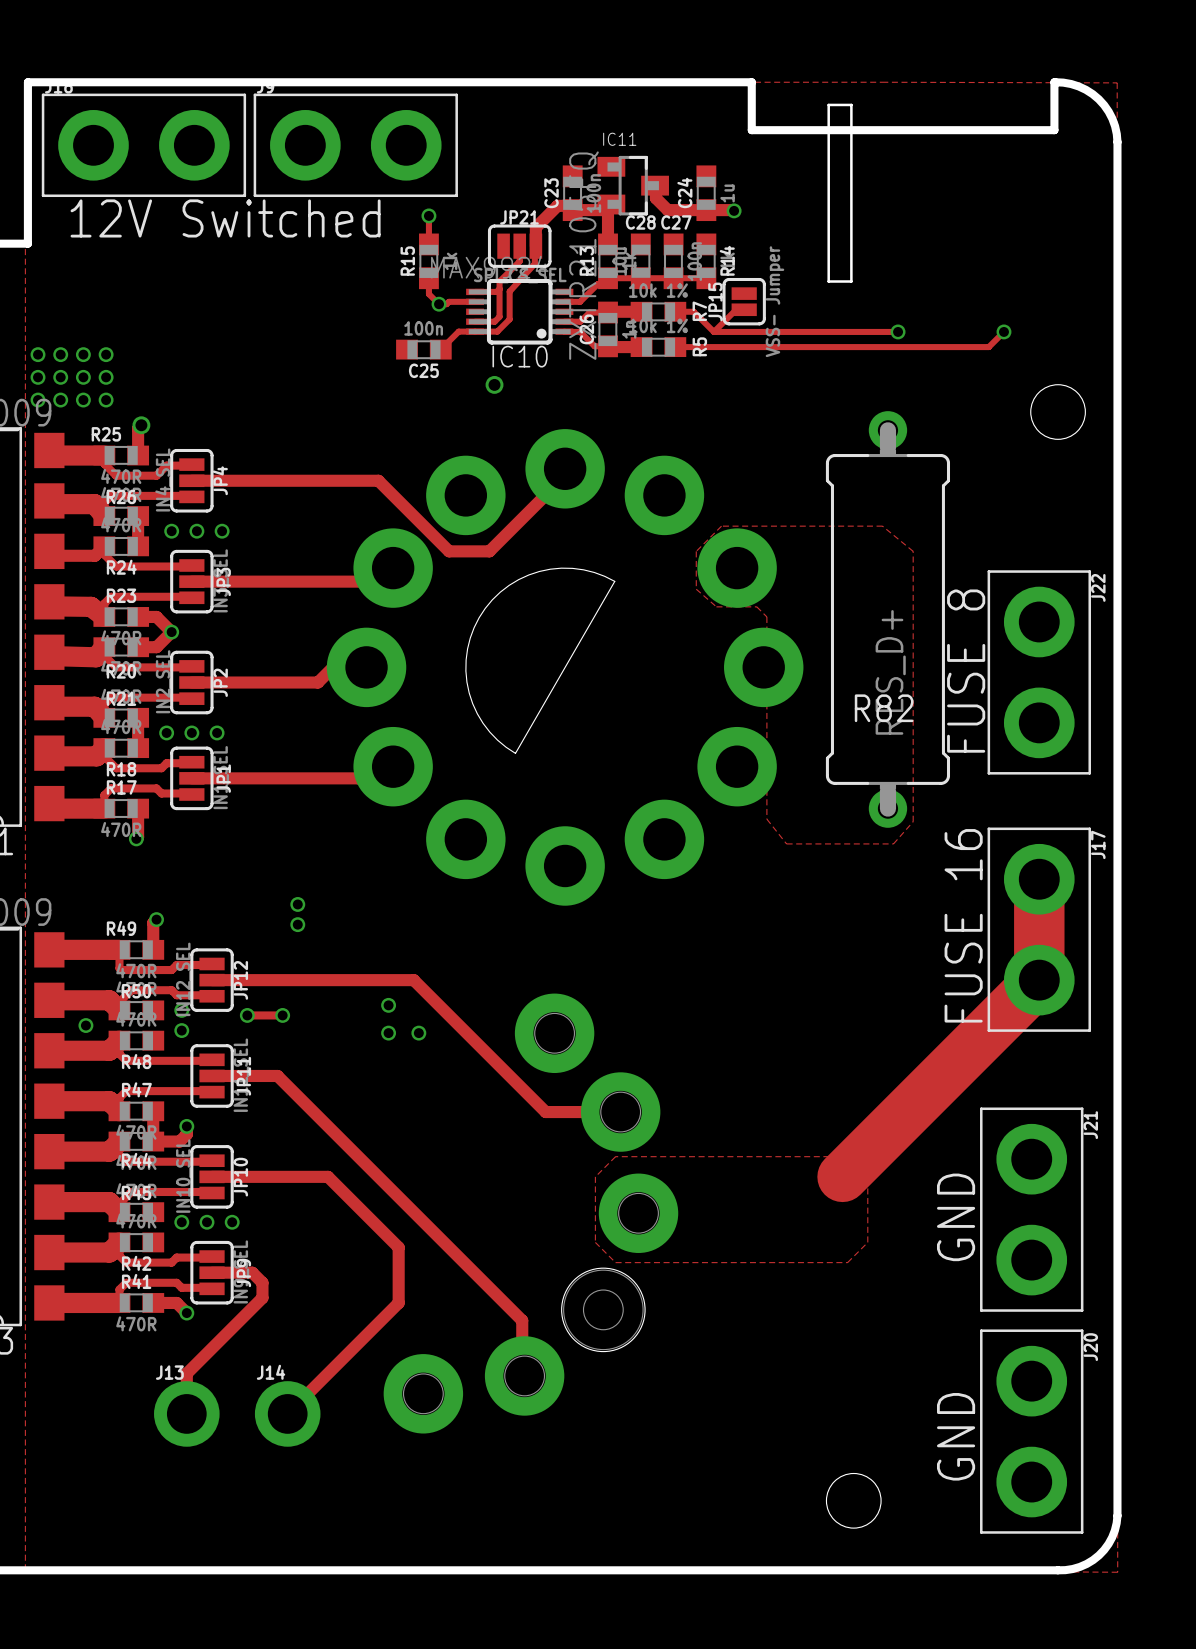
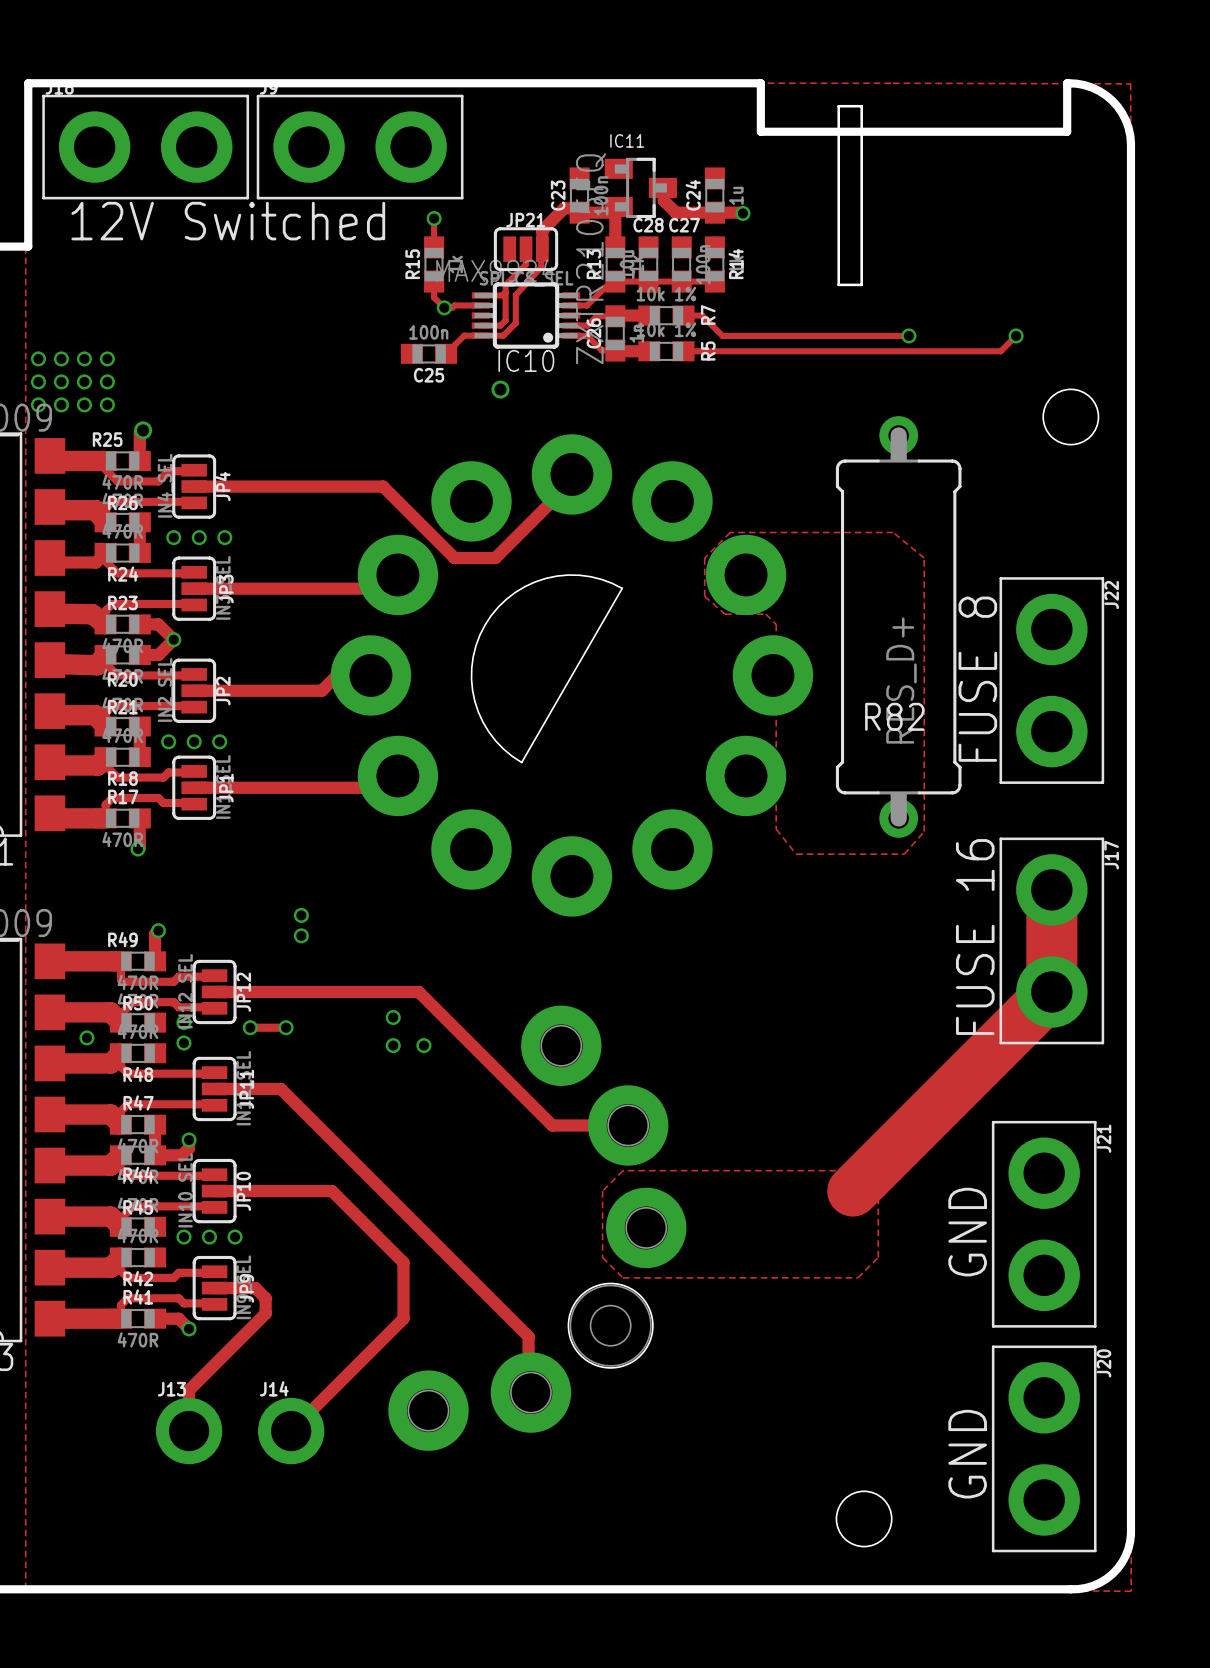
JP15: VSS- Jumper (744, 301) -> none
track: (744, 309) (736, 309) (713, 331) -> none

